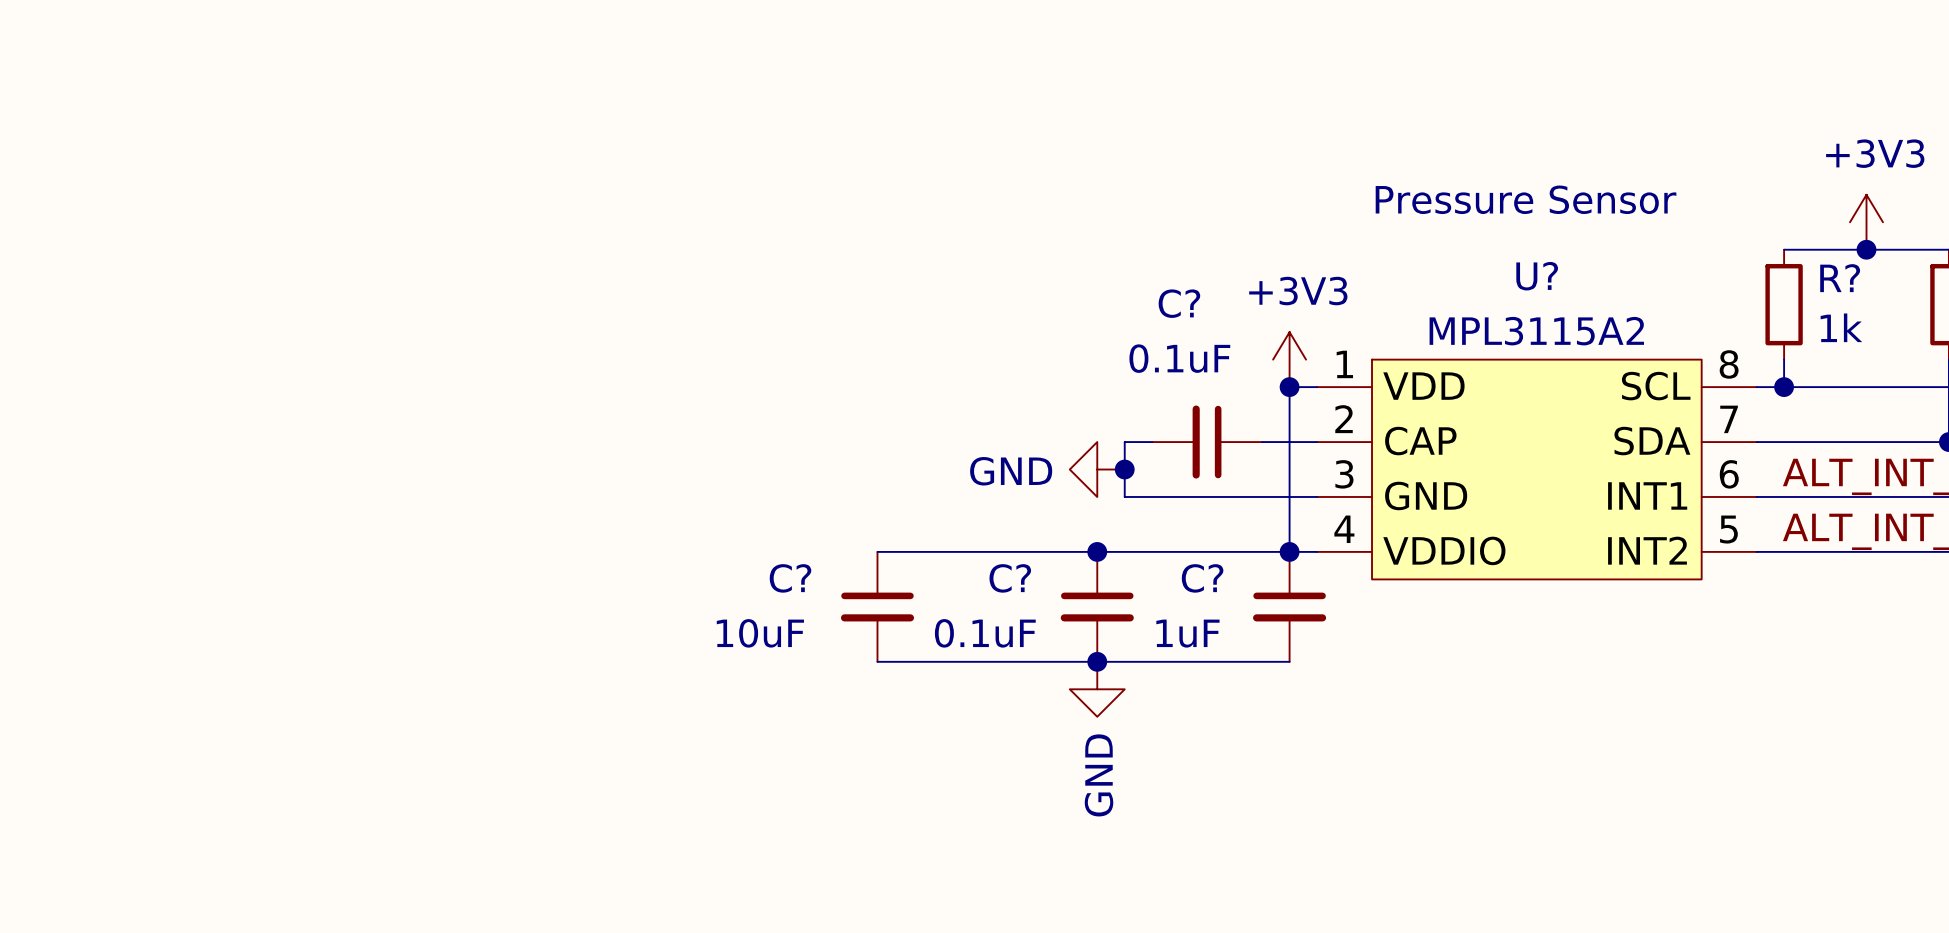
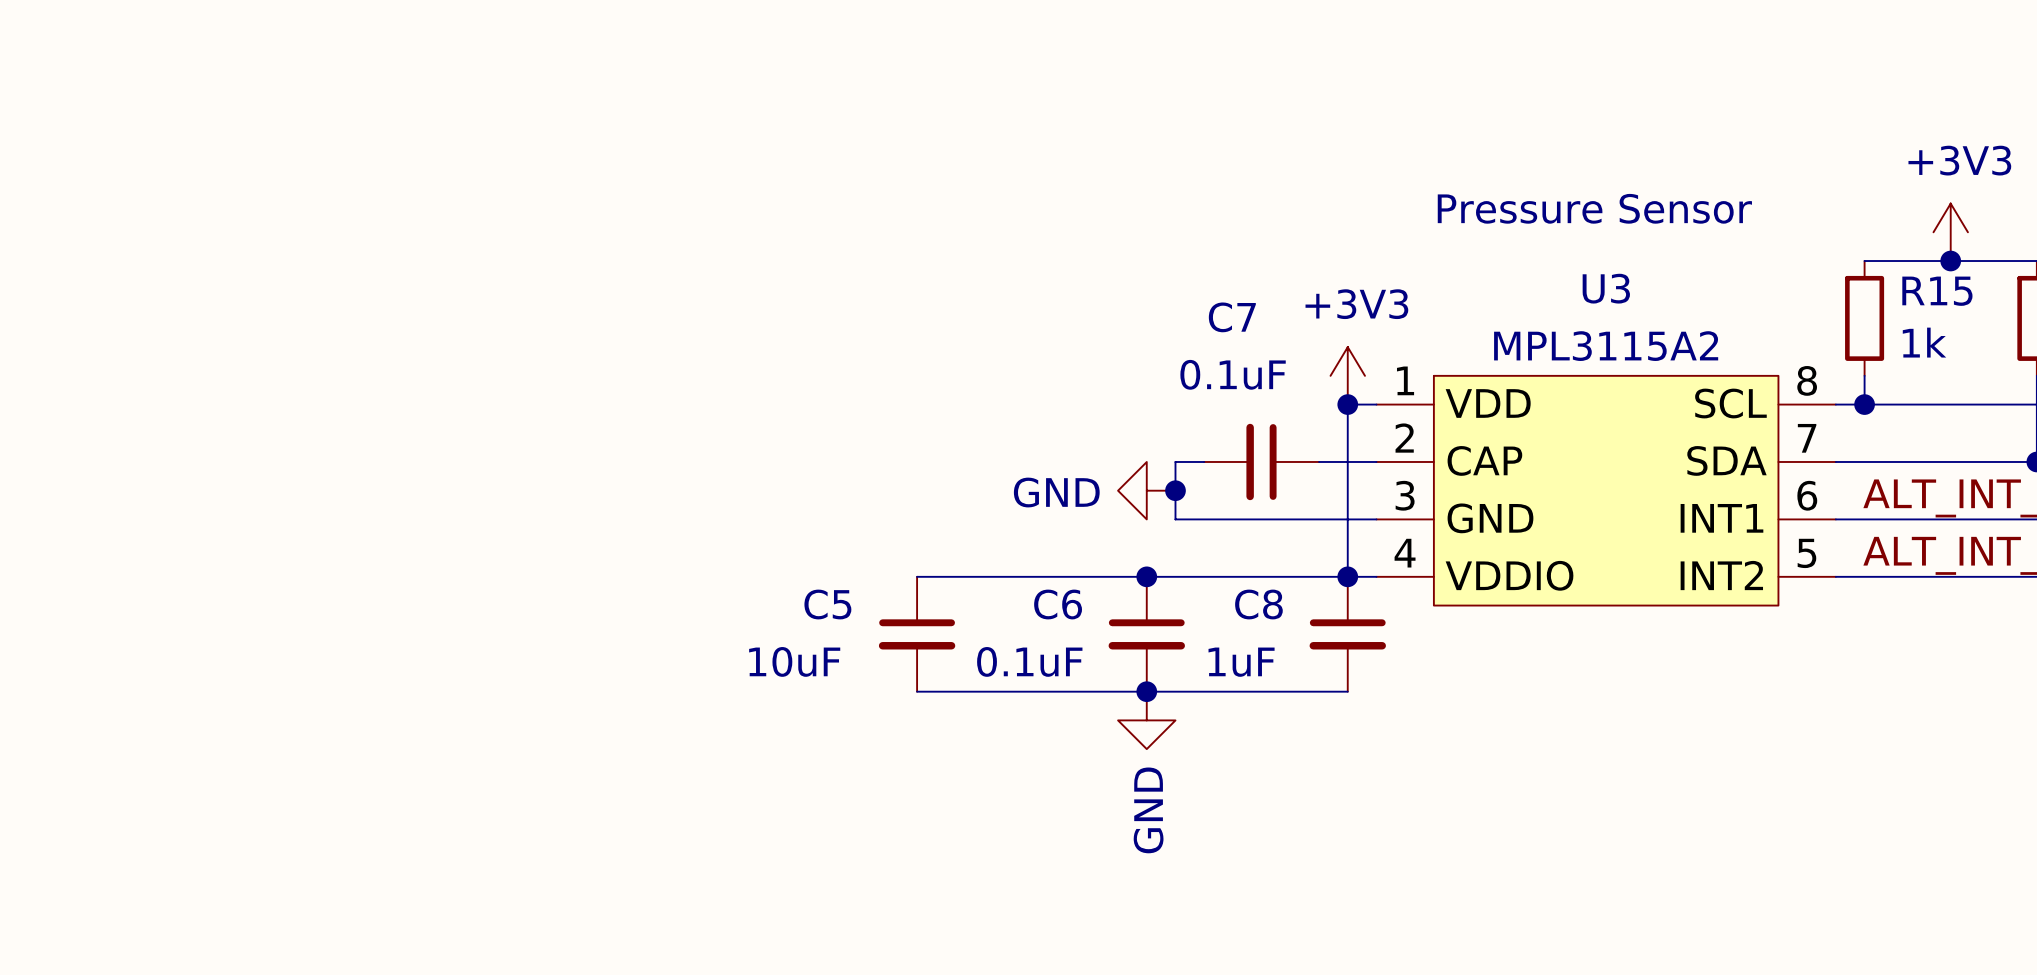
U? name: U? (1537, 276) -> U3 (1606, 288)
R? name: R? (1840, 278) -> R15 (1937, 291)
C? name: C? (1179, 303) -> C7 (1232, 317)
C? name: C? (790, 578) -> C5 (827, 604)
C? name: C? (1010, 578) -> C6 (1058, 604)
C? name: C? (1202, 578) -> C8 (1258, 604)

